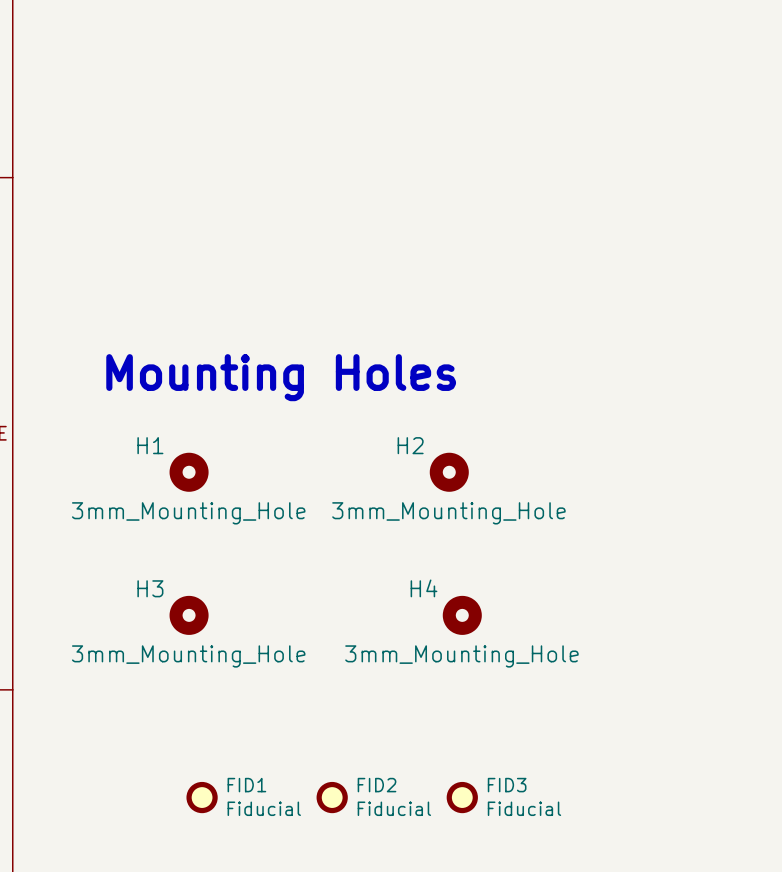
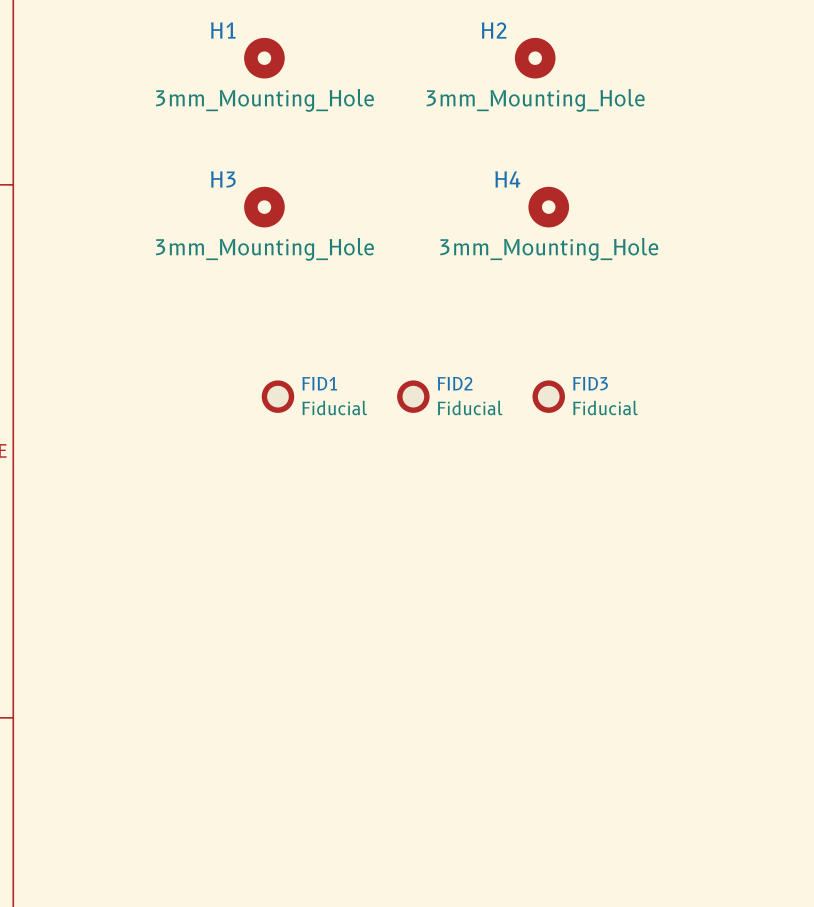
text: Mounting Holes (281, 377) -> none
H1 position: (189, 472) -> (264, 58)
H2 position: (449, 472) -> (535, 58)
H3 position: (189, 615) -> (264, 207)
H4 position: (462, 615) -> (548, 207)
FID1 position: (202, 797) -> (277, 396)
FID2 position: (332, 797) -> (413, 396)
FID3 position: (462, 797) -> (548, 396)

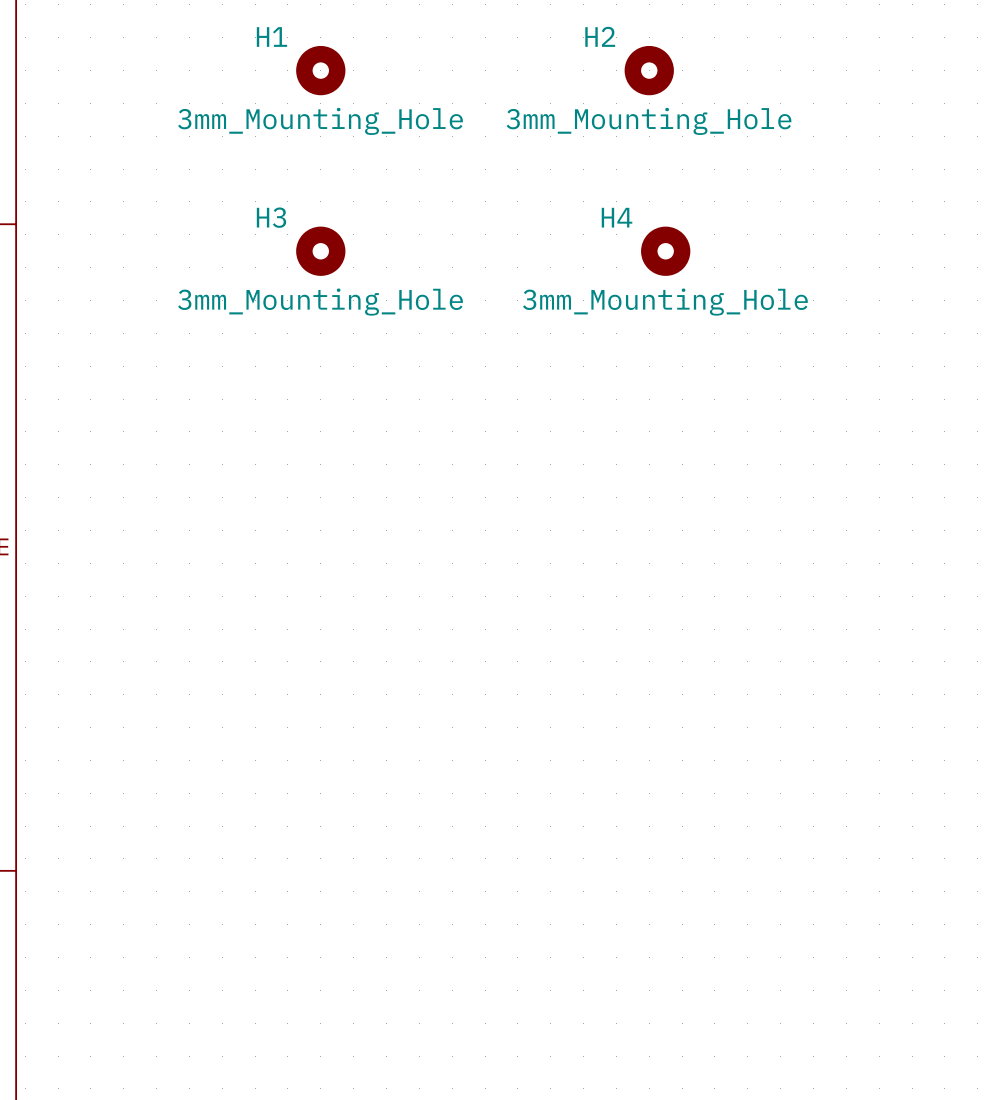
FID1: Fiducial (277, 396) -> none
FID2: Fiducial (413, 396) -> none
FID3: Fiducial (548, 396) -> none

